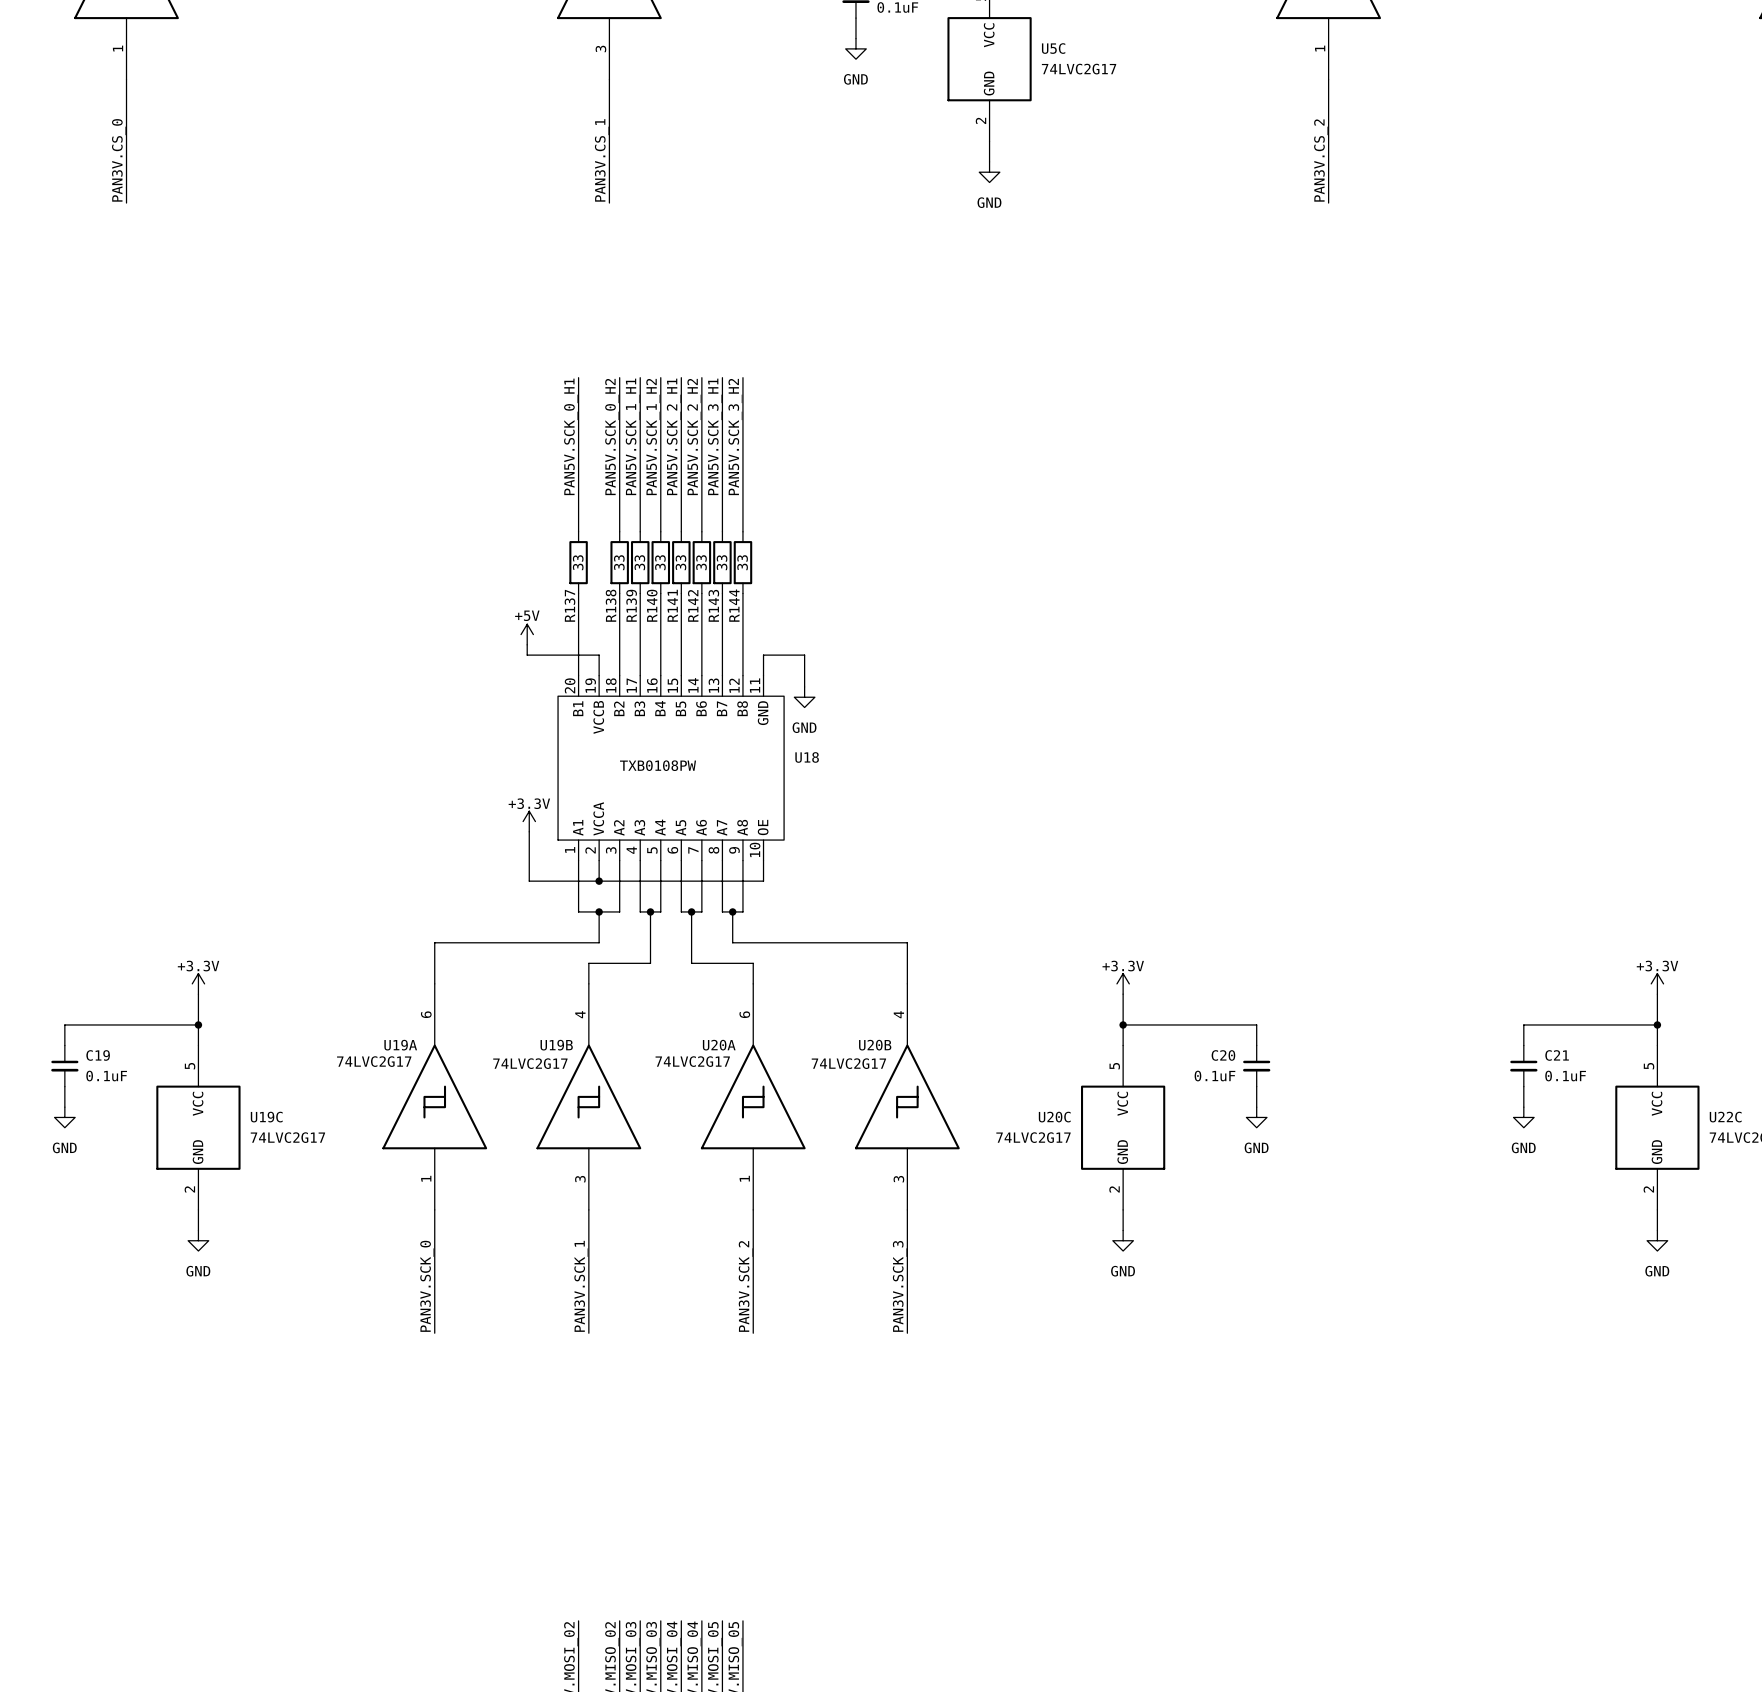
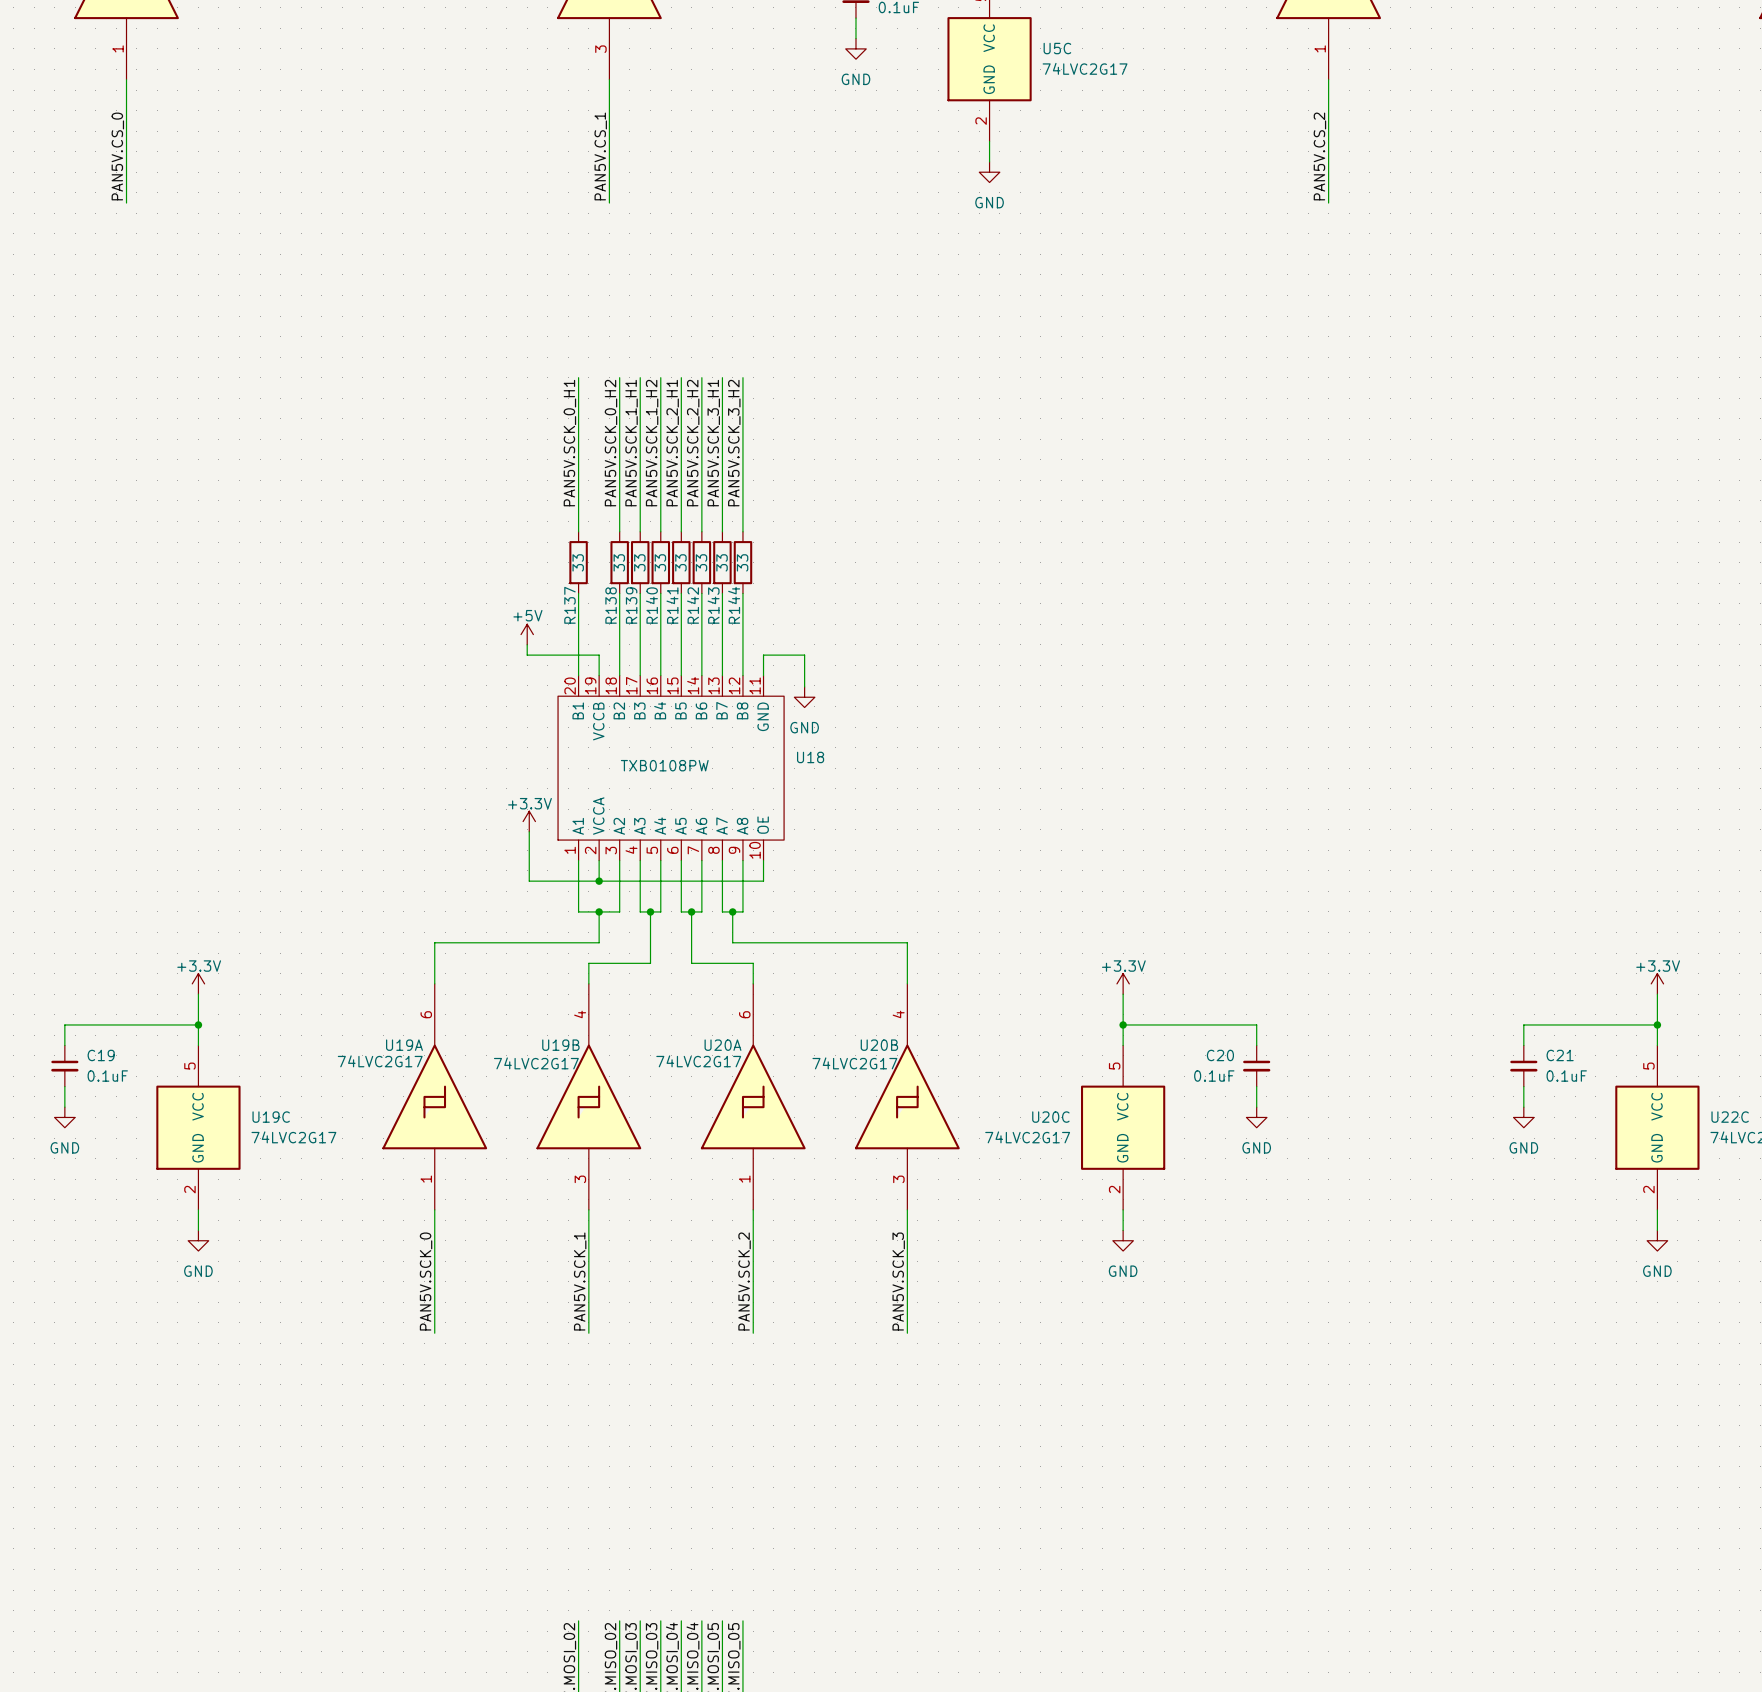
label: PAN3V.CS_0 (118, 160) -> PAN5V.CS_0 (117, 156)
label: PAN3V.CS_1 (601, 160) -> PAN5V.CS_1 (600, 156)
label: PAN3V.CS_2 (1321, 160) -> PAN5V.CS_2 (1319, 156)
label: PAN3V.SCK_0 (427, 1286) -> PAN5V.SCK_0 (426, 1281)
label: PAN3V.SCK_1 (581, 1286) -> PAN5V.SCK_1 (580, 1281)
label: PAN3V.SCK_2 (745, 1286) -> PAN5V.SCK_2 (744, 1281)
label: PAN3V.SCK_3 (899, 1286) -> PAN5V.SCK_3 (898, 1281)

